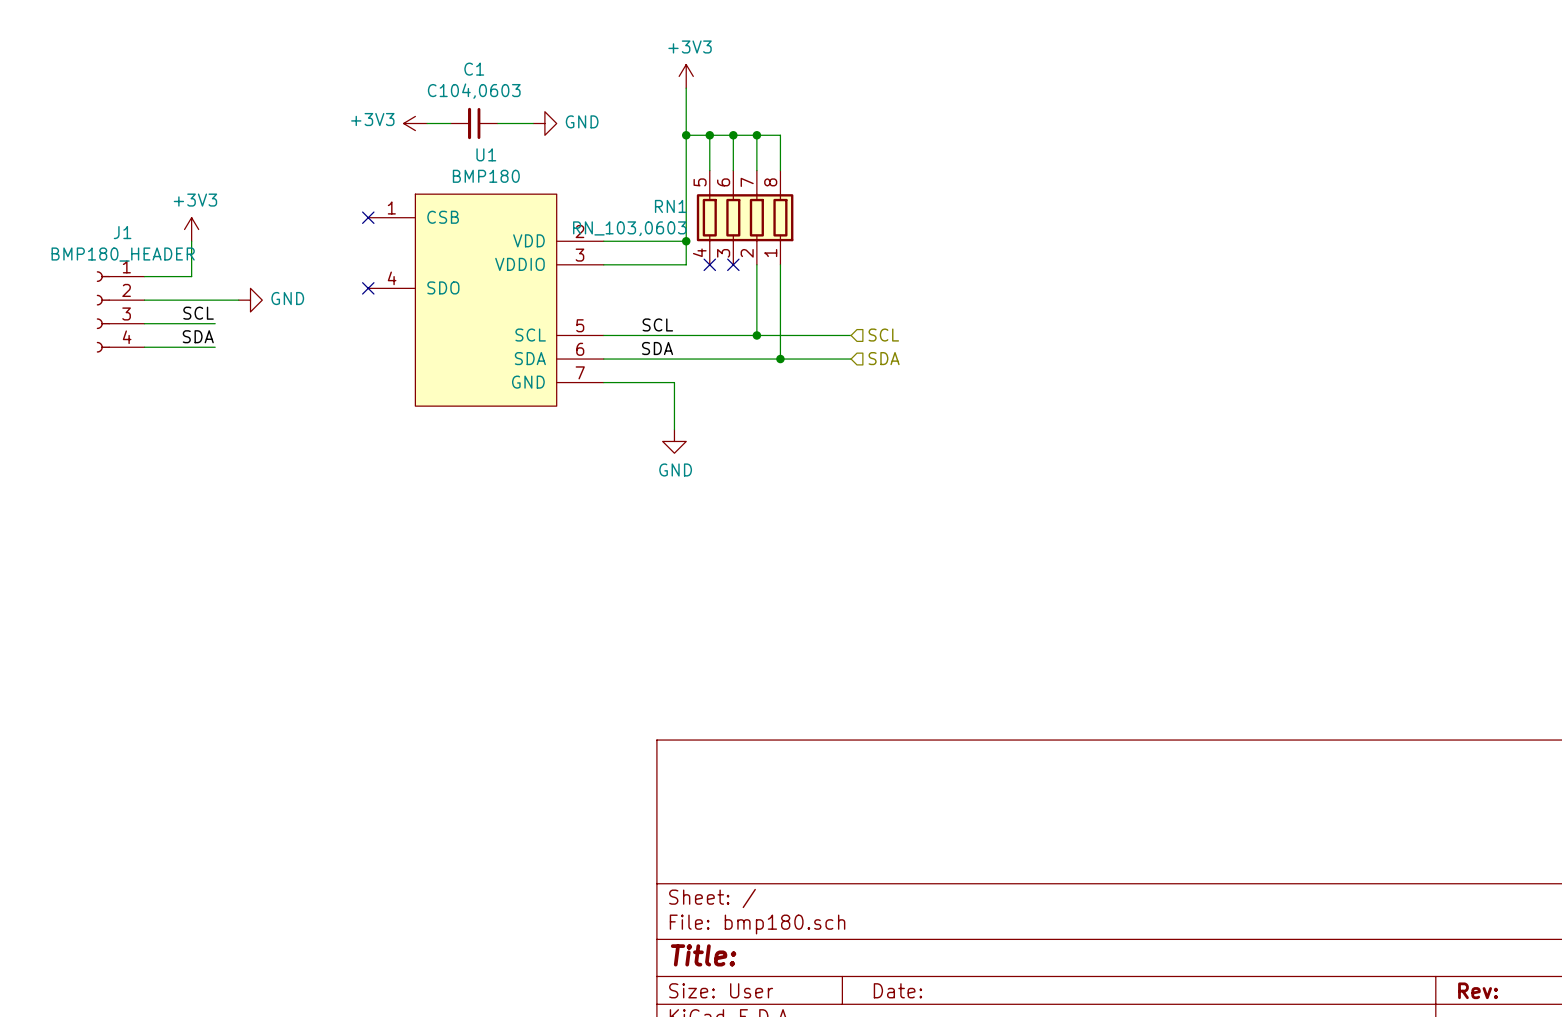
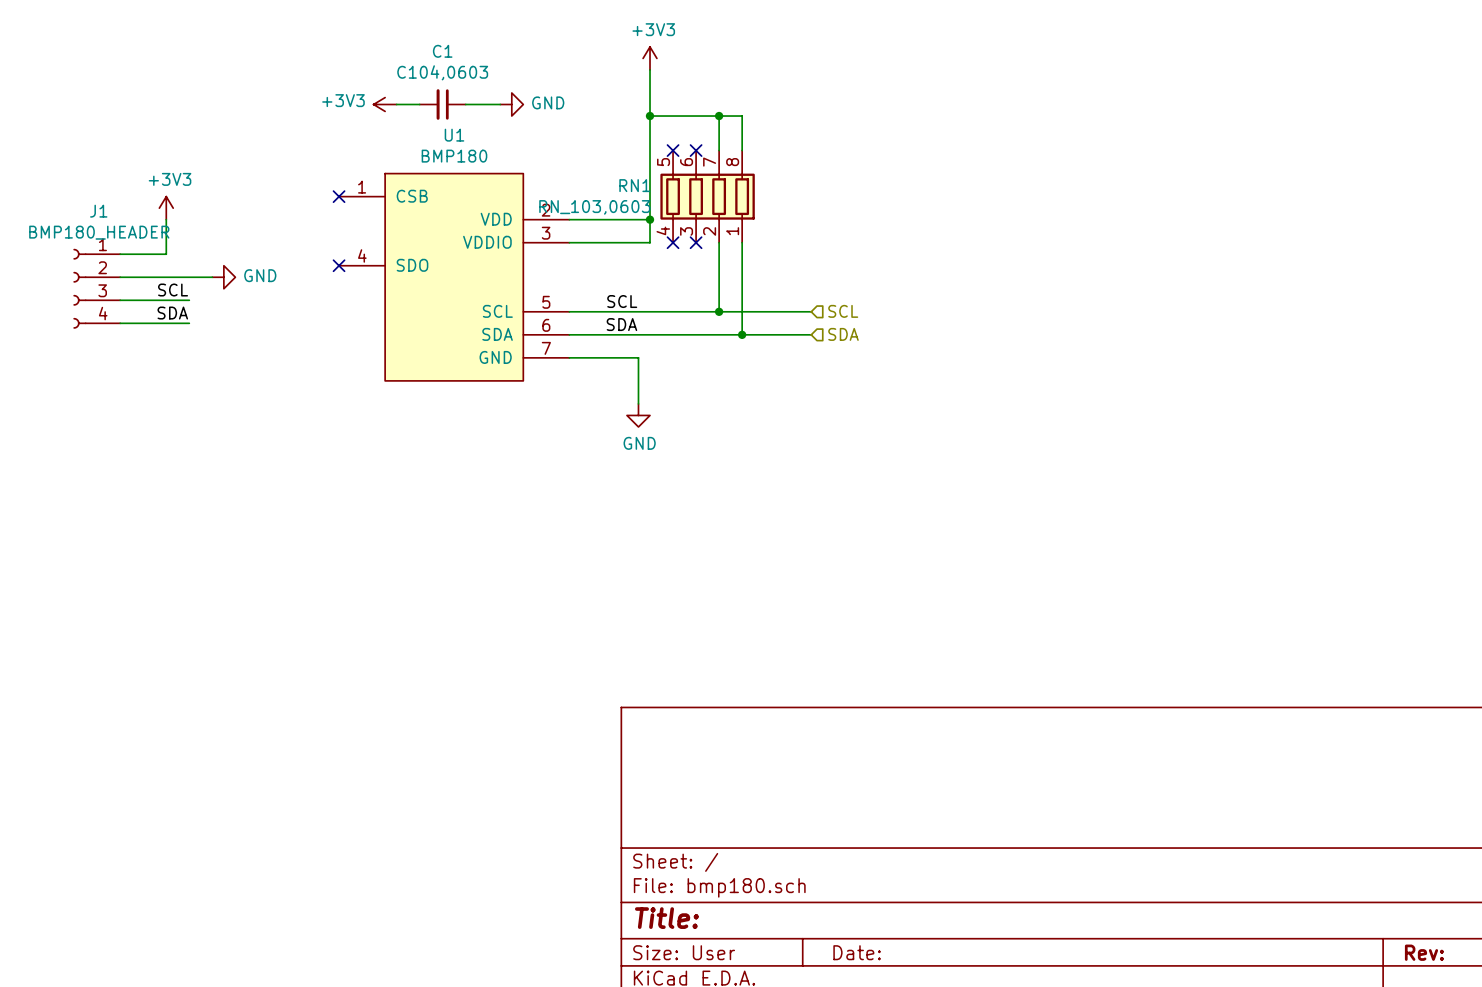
wire: (709, 135) (709, 170) -> none
junction: (709, 135) -> none
wire: (733, 135) (733, 170) -> none
junction: (733, 135) -> none
no-connect mark: none -> (673, 150)
no-connect mark: none -> (696, 150)

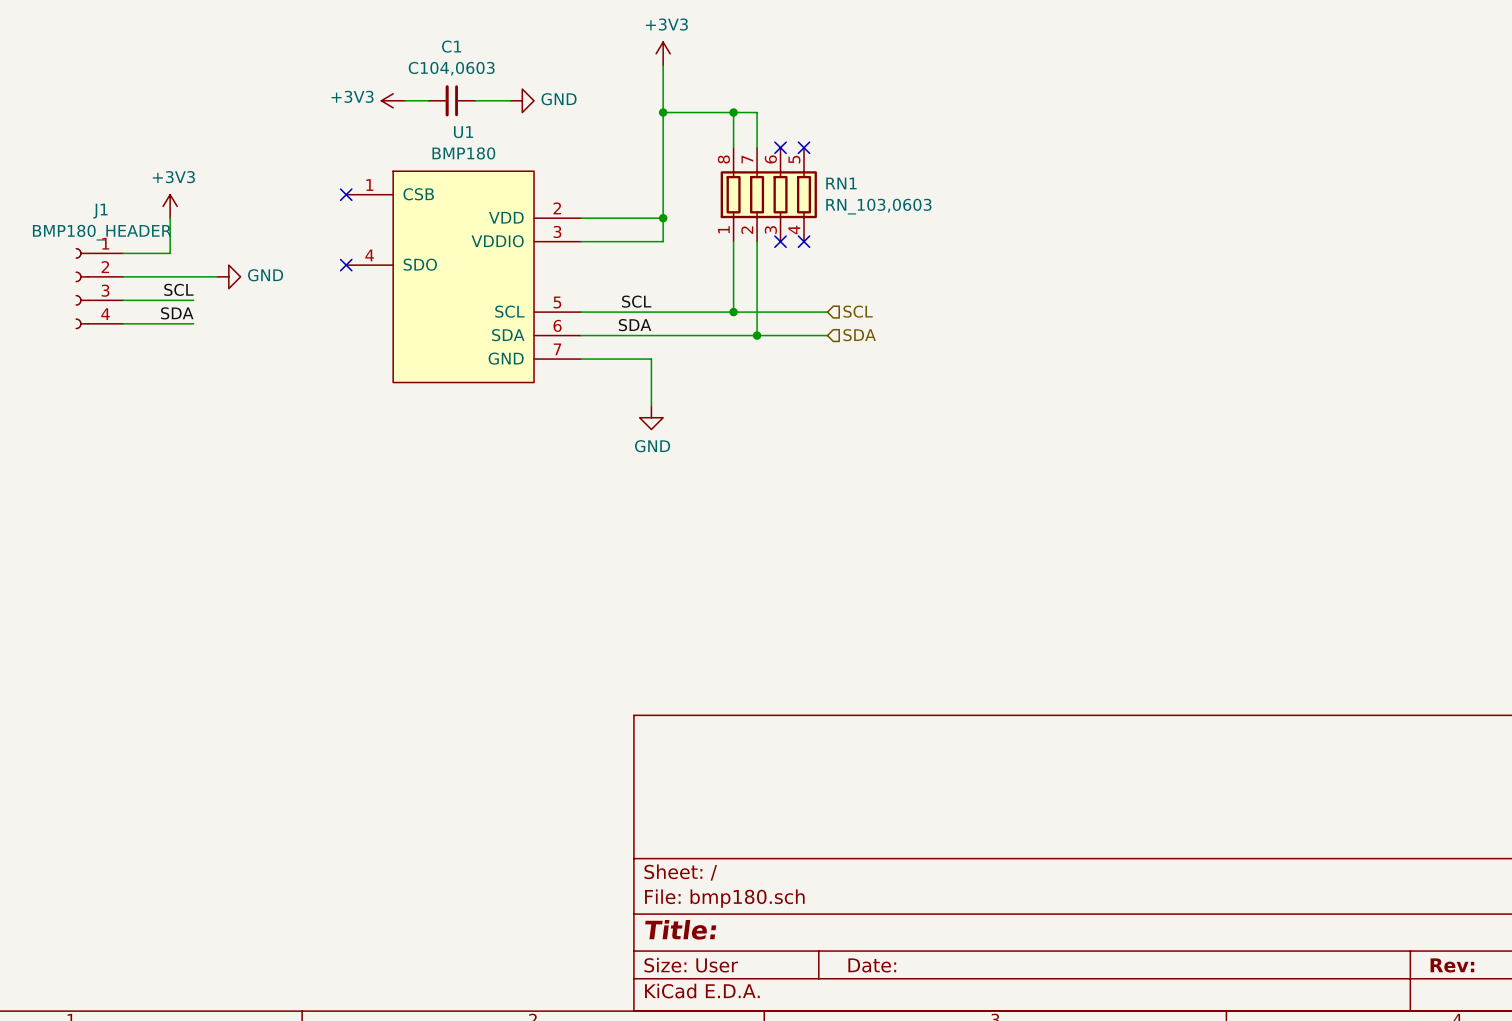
no-connect mark: (673, 150) -> none
no-connect mark: (696, 150) -> none
no-connect mark: none -> (780, 147)
no-connect mark: none -> (804, 147)
RN1 flip: as is (707, 196) -> left-right (768, 194)
no-connect mark: (673, 242) -> none
no-connect mark: (696, 242) -> none
no-connect mark: none -> (780, 241)
no-connect mark: none -> (804, 241)

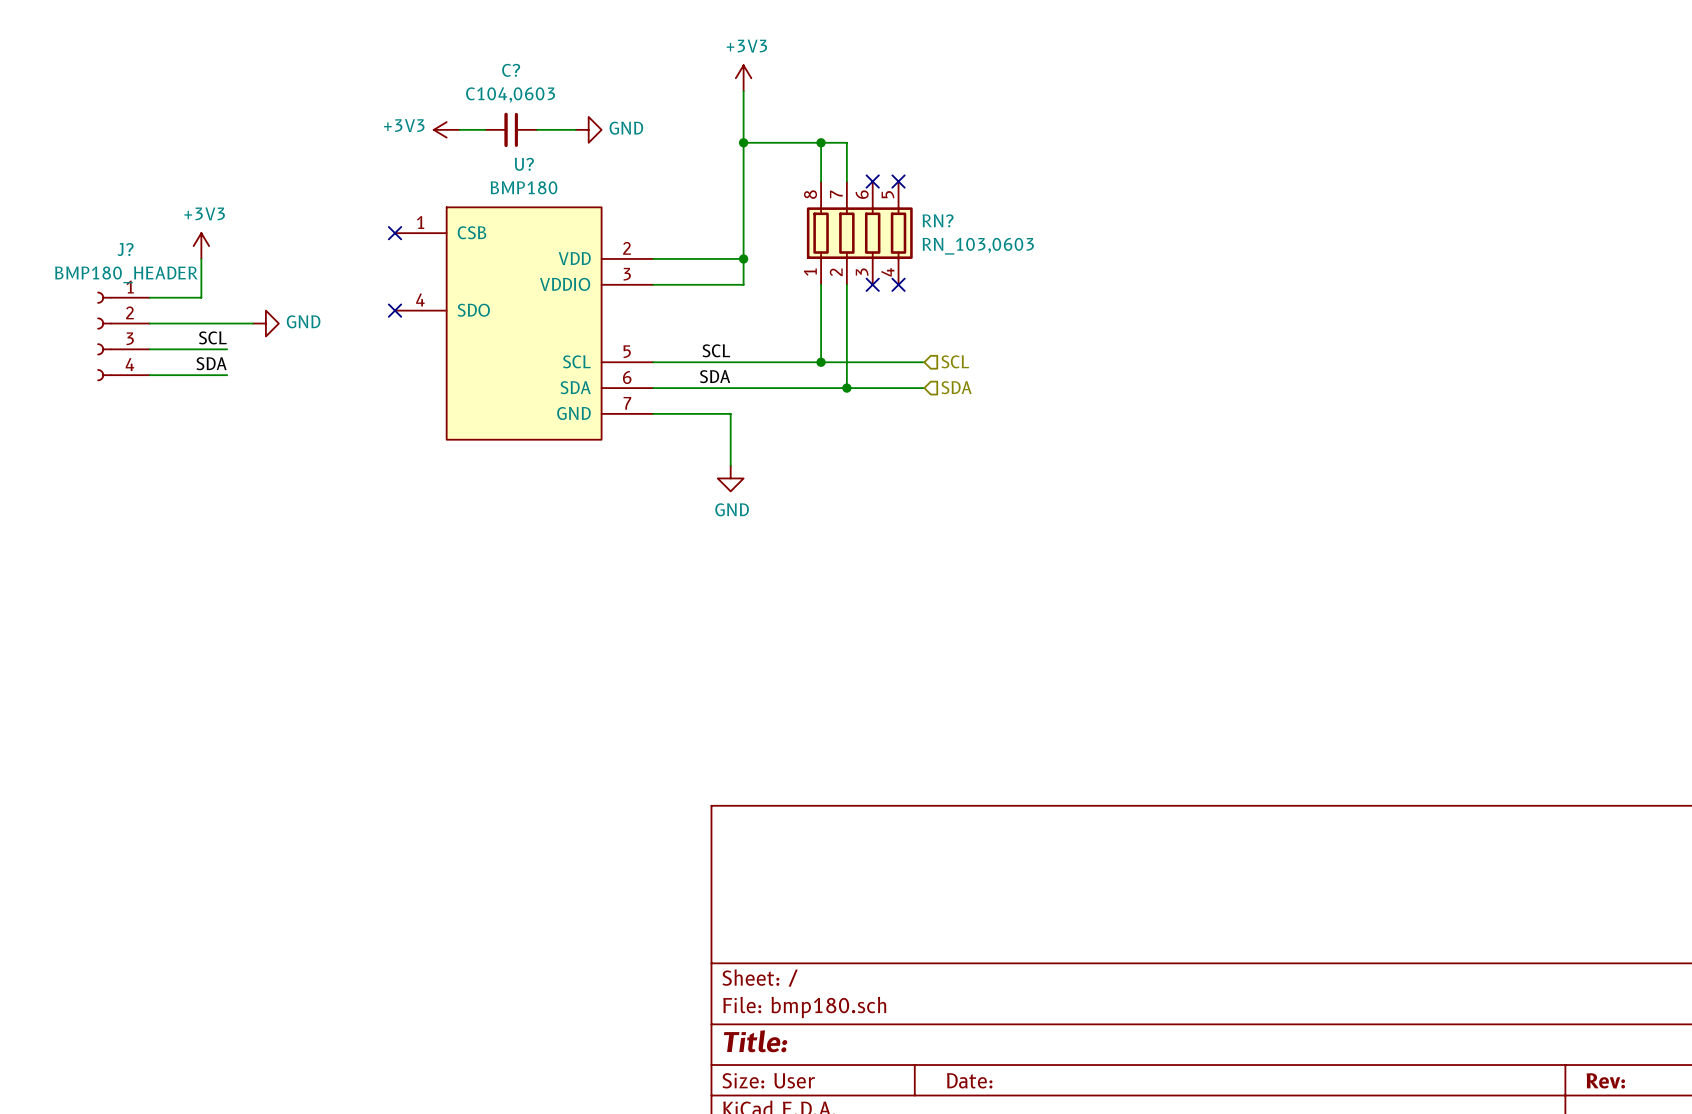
C1 name: C1 (451, 46) -> C? (511, 70)
U1 name: U1 (463, 132) -> U? (524, 164)
RN1 name: RN1 (841, 183) -> RN? (938, 220)
J1 name: J1 (100, 211) -> J? (125, 249)

